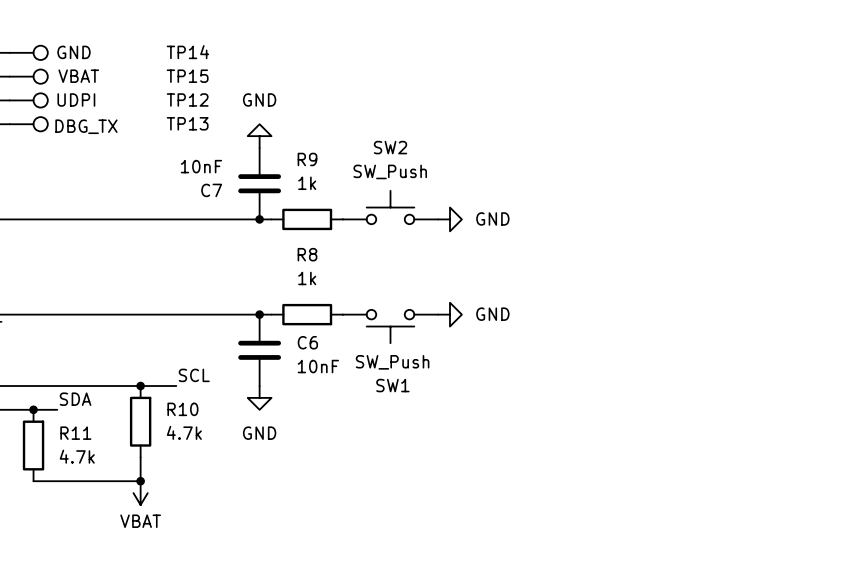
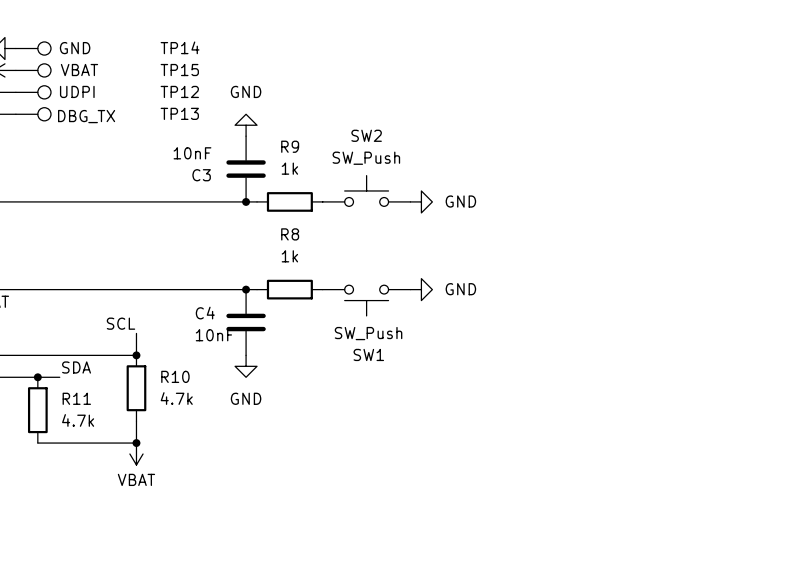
C7 name: C7 (211, 190) -> C3 (201, 175)
C6 name: C6 (307, 342) -> C4 (205, 313)
C6 value position: 10nF (318, 366) -> 10nF (214, 335)
label position: SCL (194, 375) -> SCL (120, 323)
wire: (140, 386) (176, 386) -> (136, 355) (136, 333)

